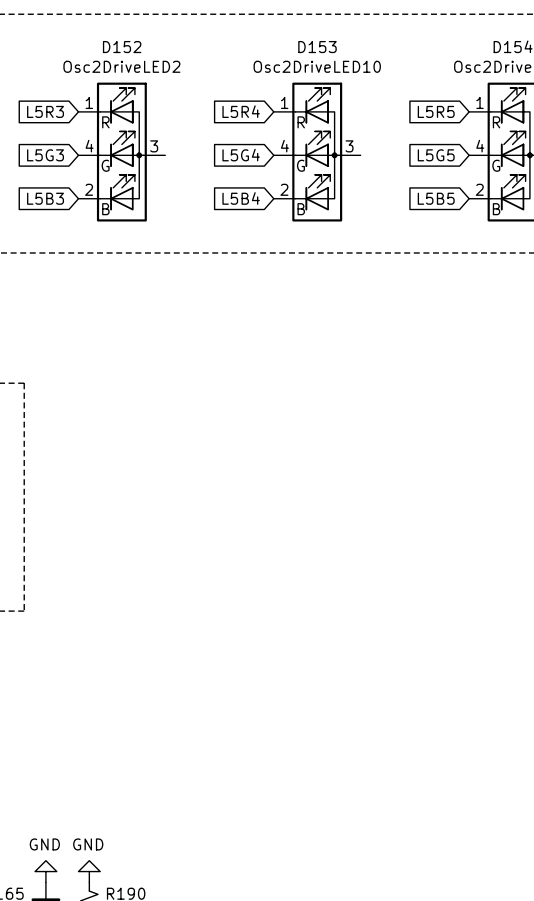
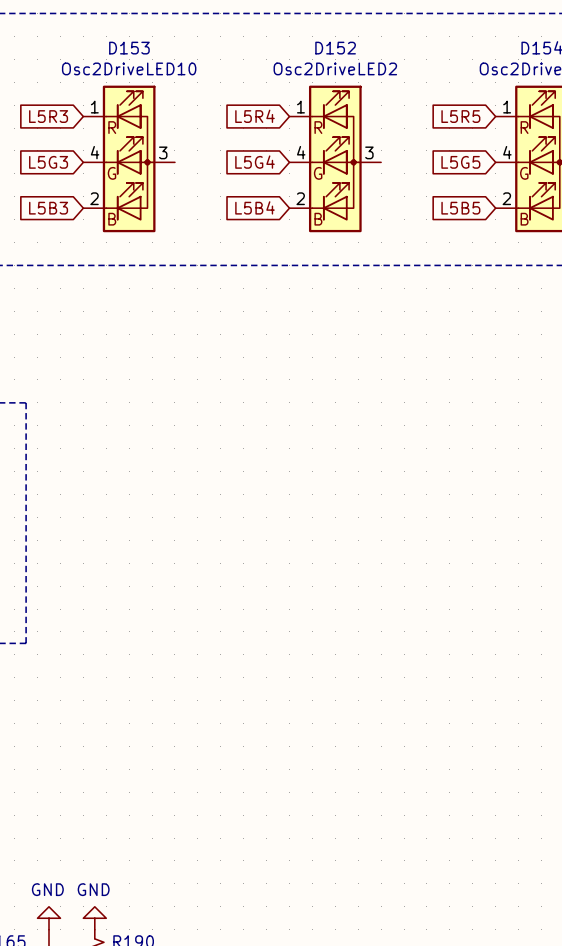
D152 name: D152 (122, 47) -> D153 (129, 48)
D153 name: D153 (317, 47) -> D152 (335, 48)
D152 value: Osc2DriveLED2 (121, 66) -> Osc2DriveLED10 (129, 68)
D153 value: Osc2DriveLED10 (317, 66) -> Osc2DriveLED2 (335, 68)

